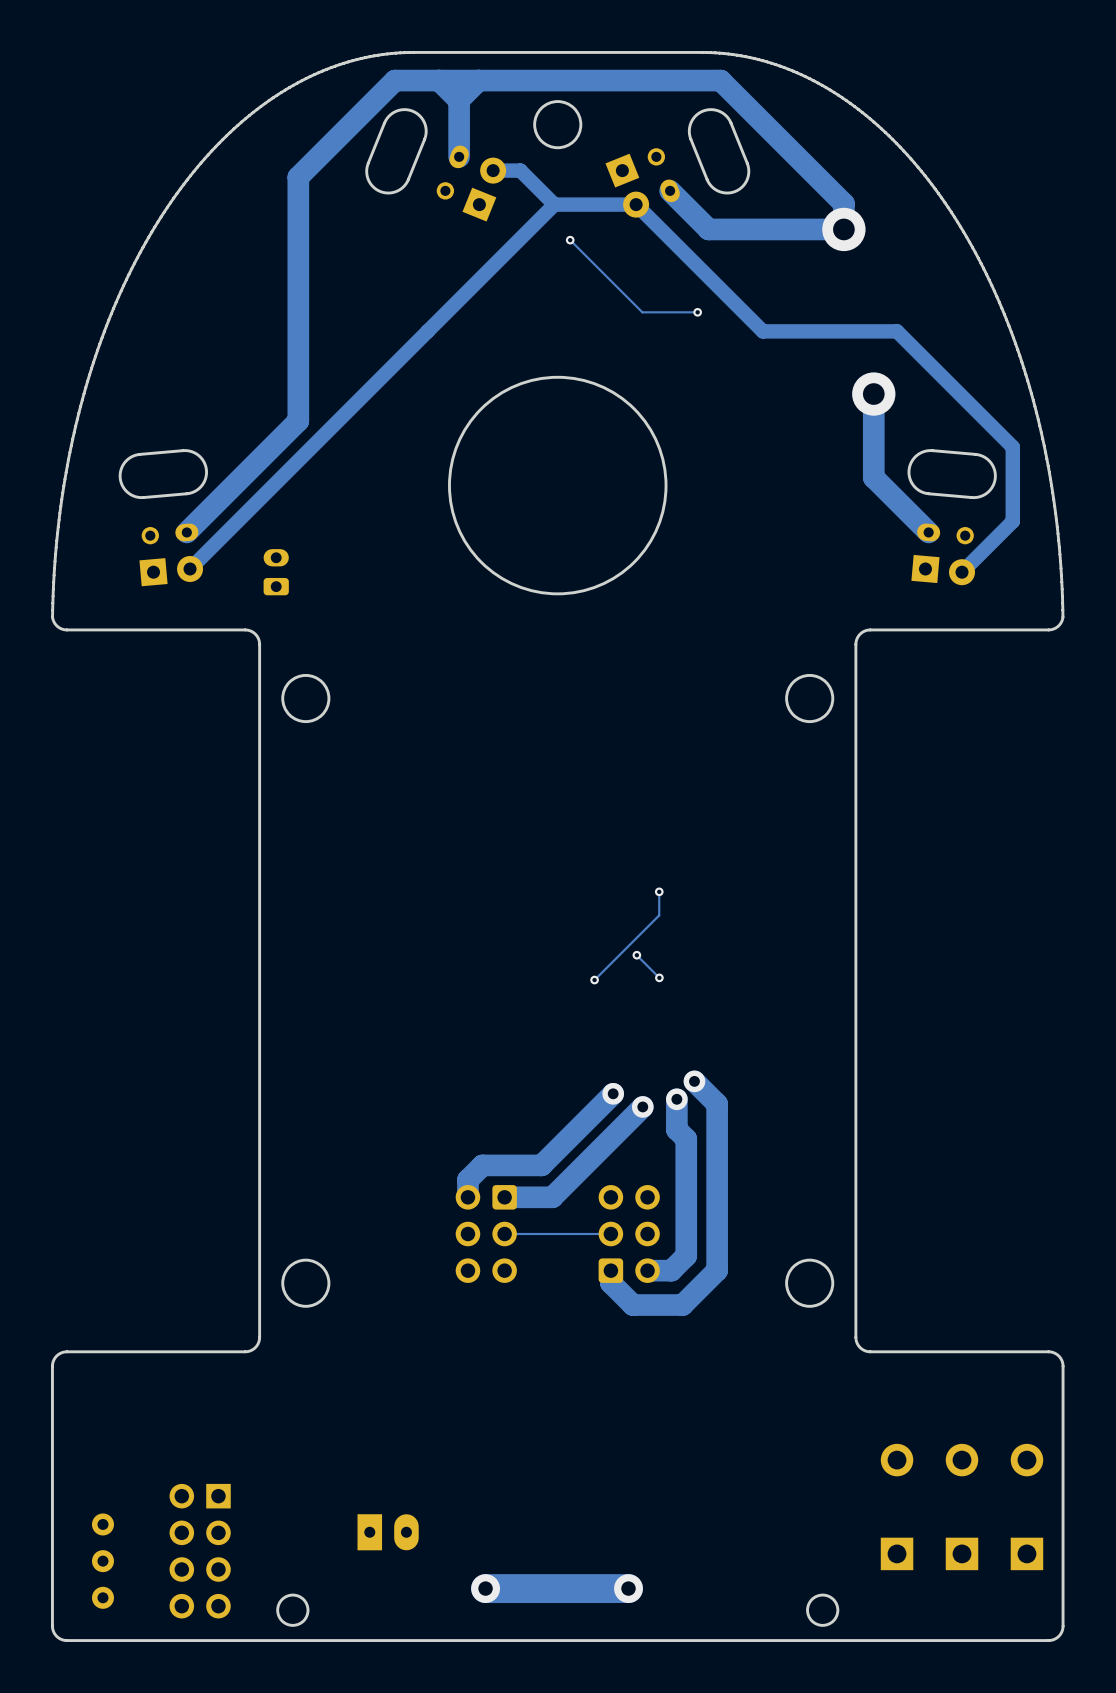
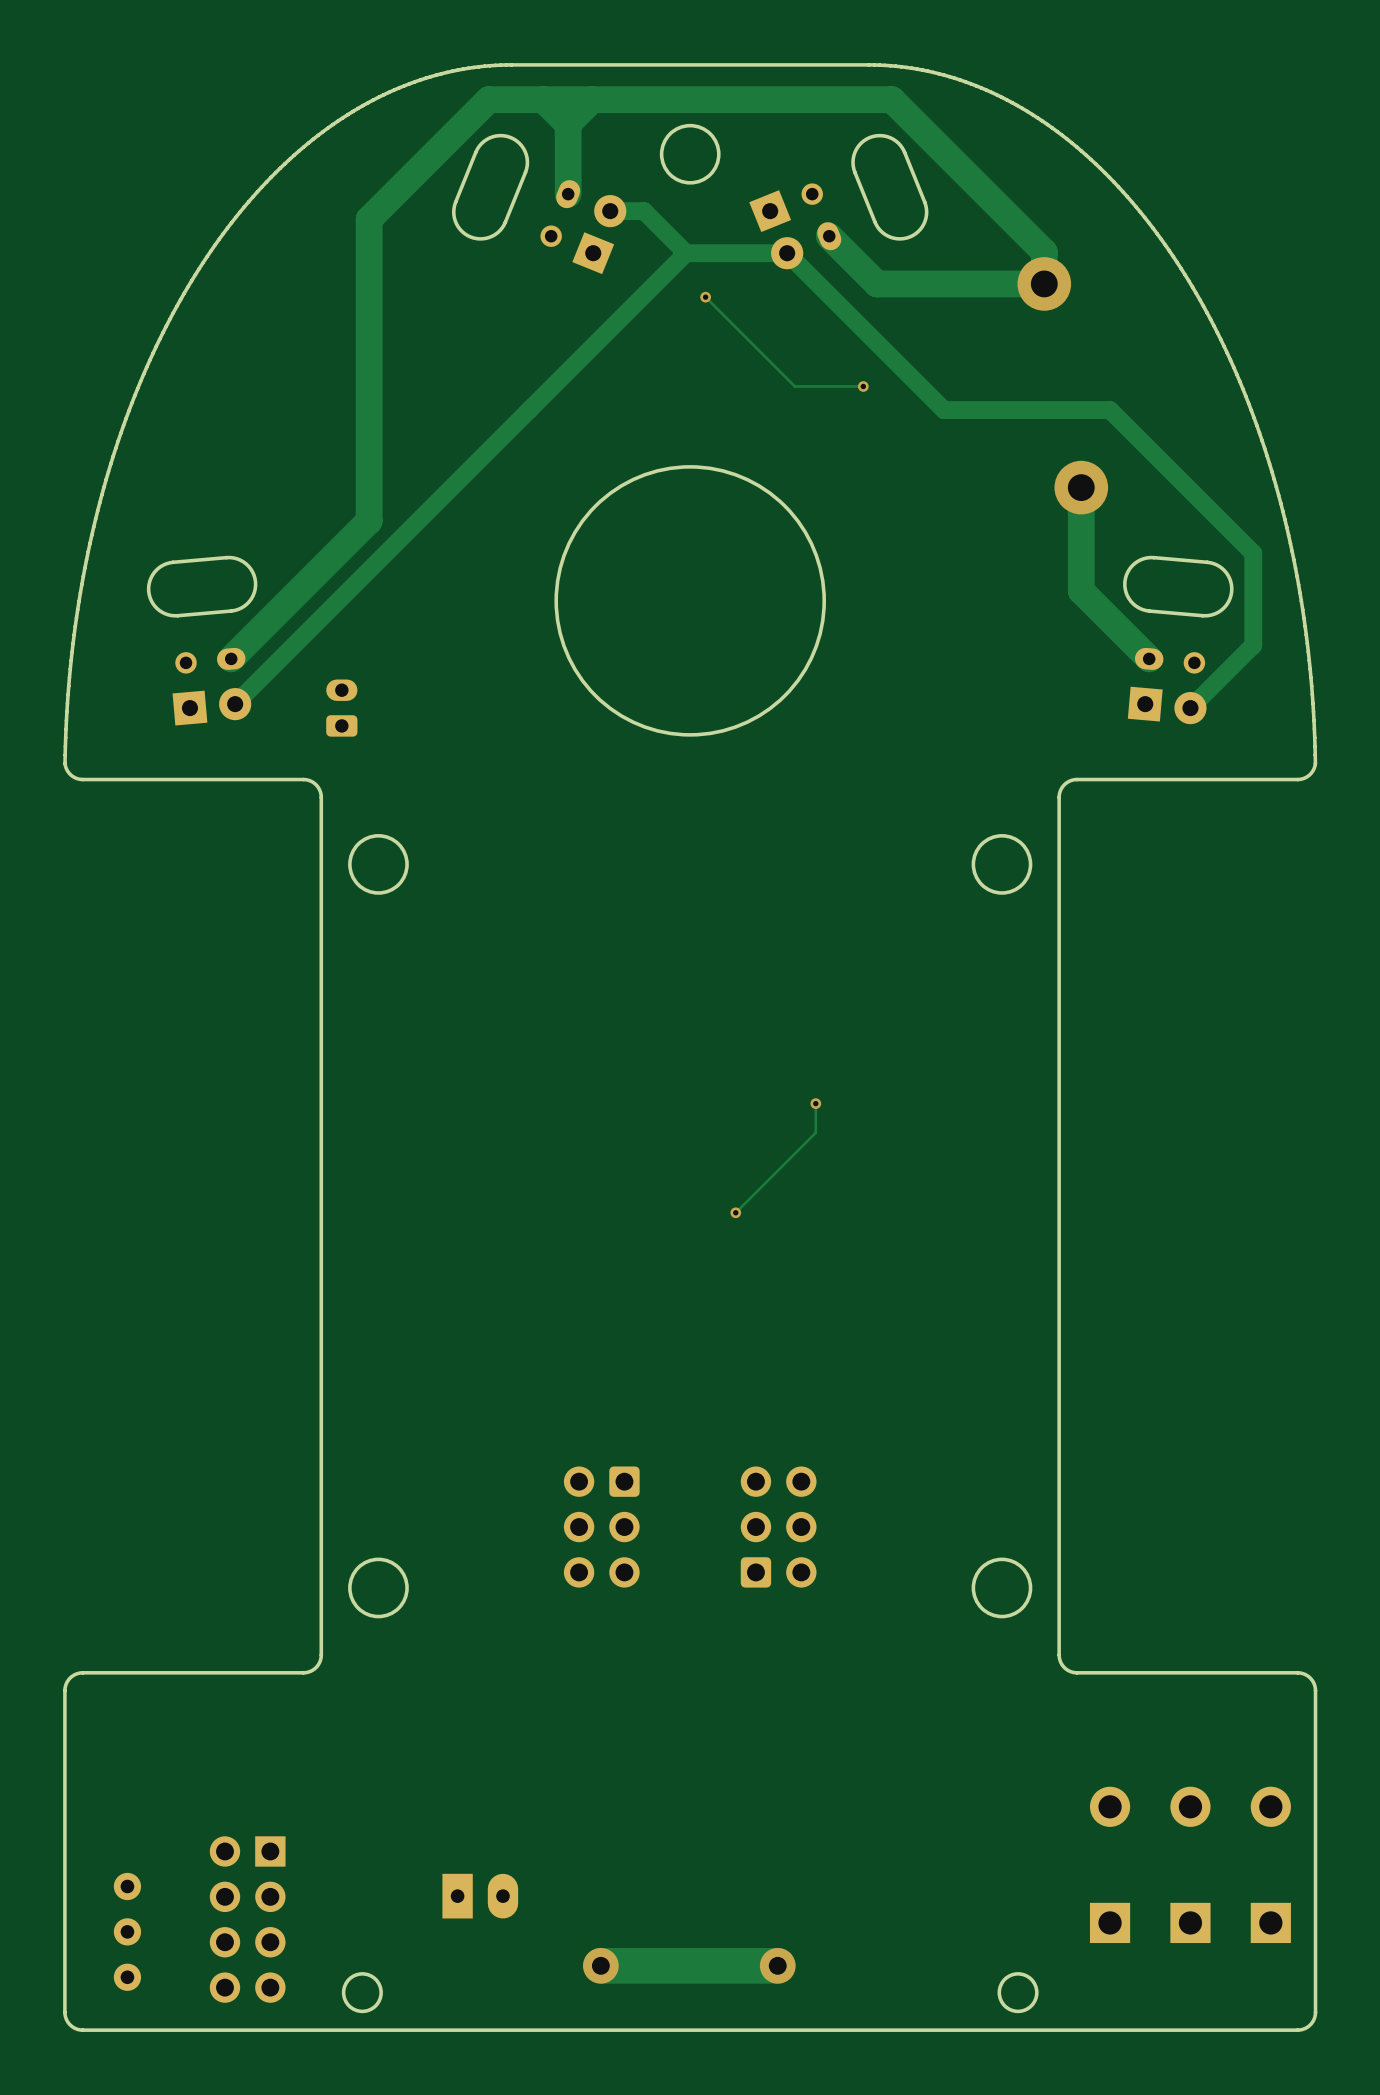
track: (636, 955) (659, 977) -> none
via: (636, 955) -> none
via: (659, 977) -> none
track: (694, 1081) (717, 1104) (717, 1270) (682, 1305) (632, 1305) (610, 1282) (610, 1270) -> none
via: (694, 1081) -> none
track: (613, 1093) (541, 1165) (482, 1165) (467, 1179) (467, 1197) -> none
via: (613, 1093) -> none
track: (676, 1099) (676, 1129) (686, 1138) (686, 1255) (671, 1270) (647, 1270) -> none
via: (676, 1099) -> none
track: (642, 1106) (552, 1197) (504, 1197) -> none
via: (642, 1106) -> none
track: (610, 1233) (504, 1233) -> none

